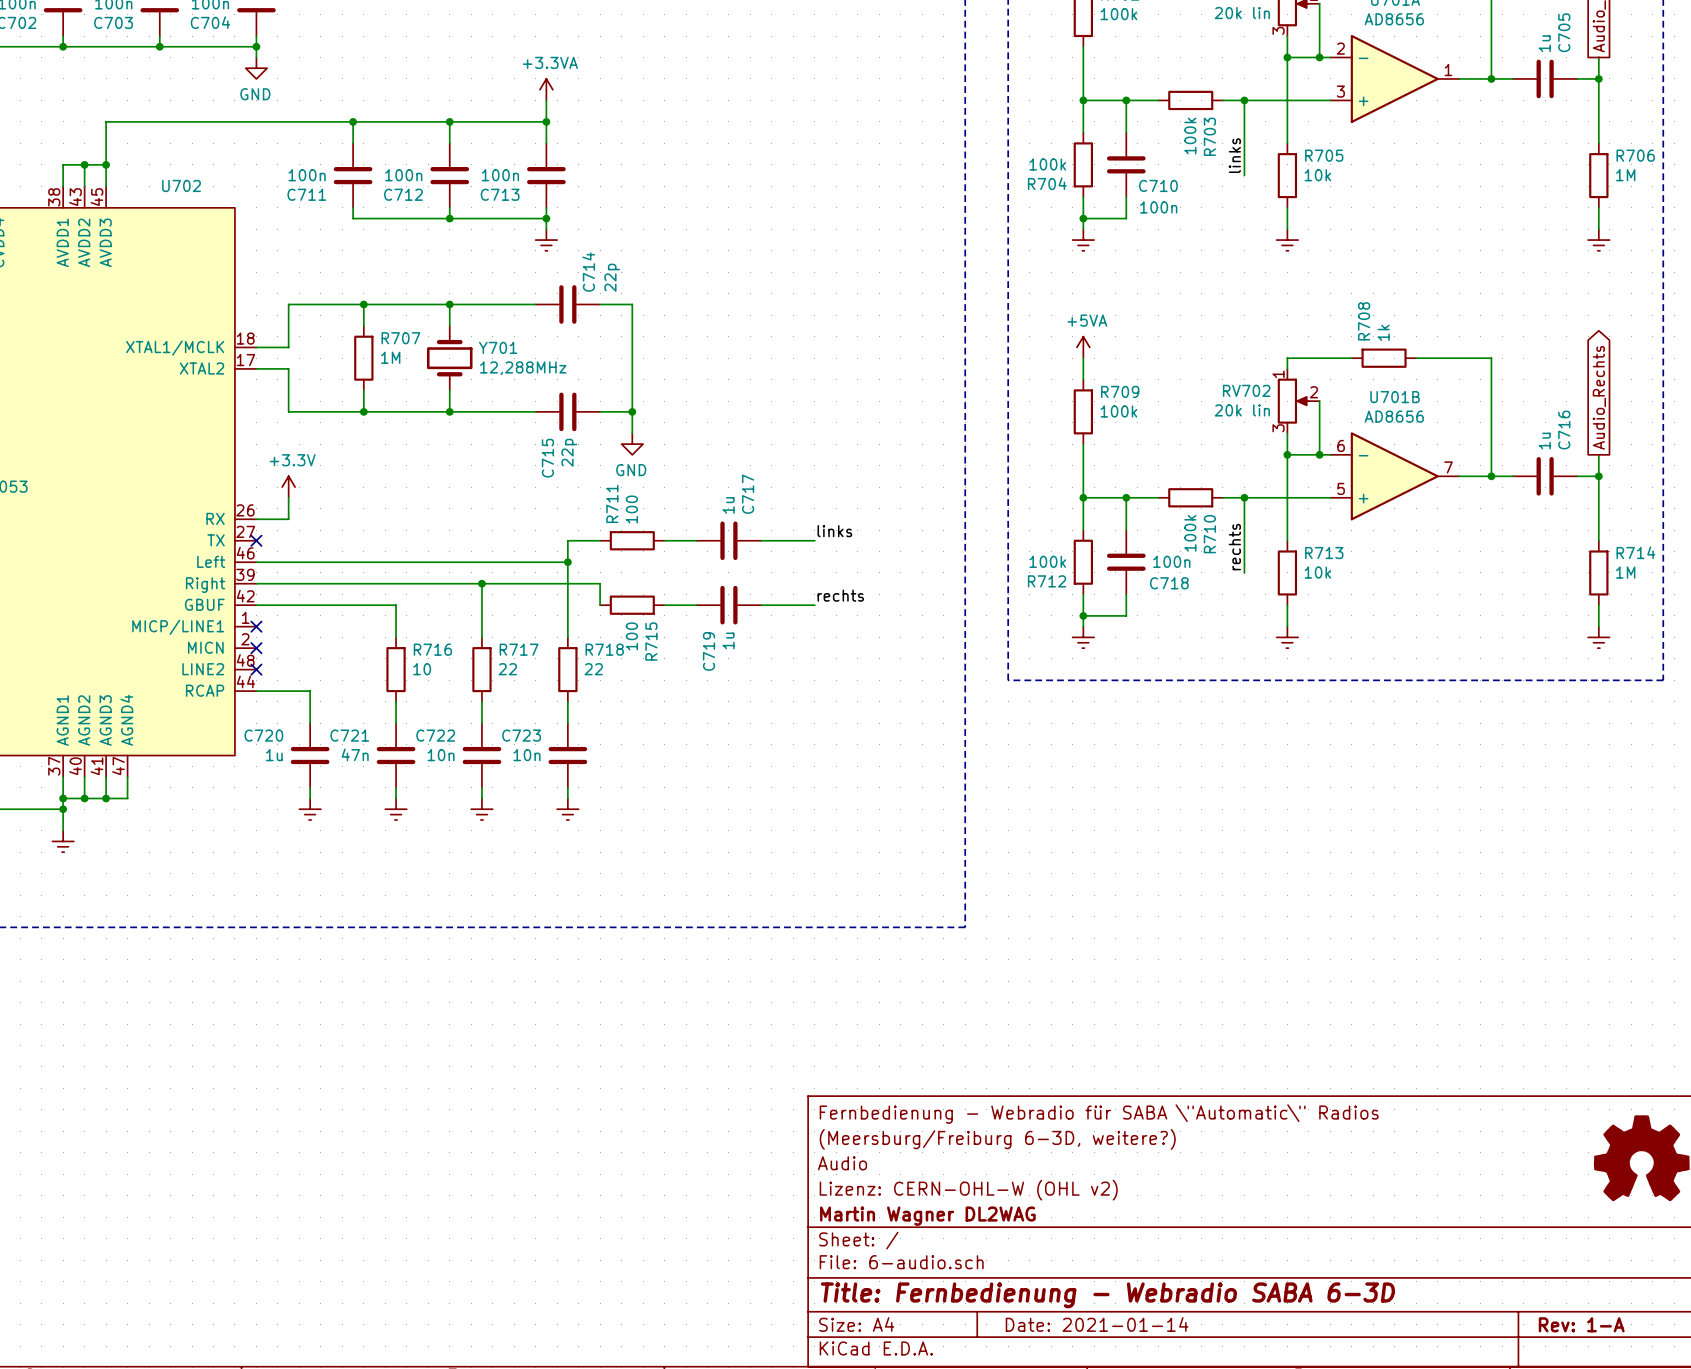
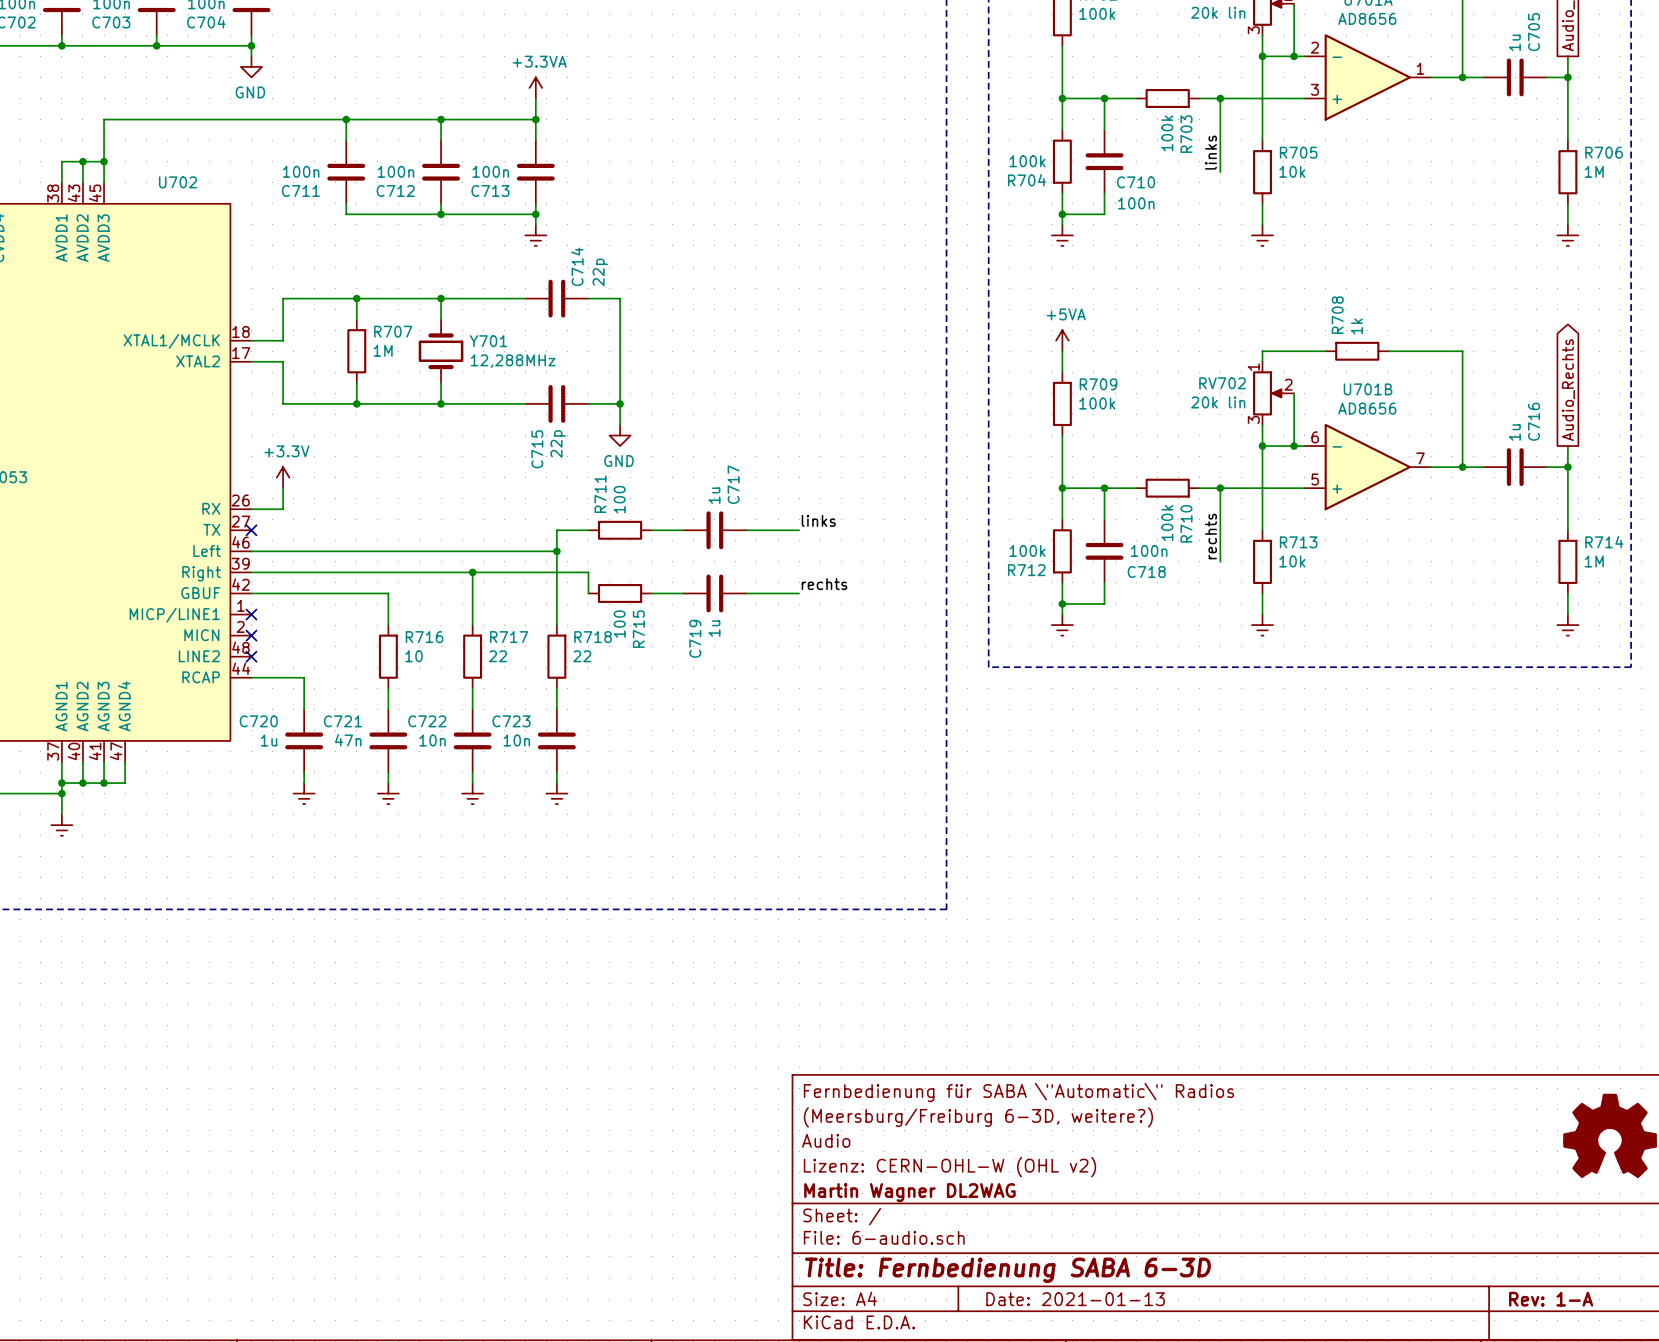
title block: Fernbedienung - Webradio für SABA \"Automatic\" Radios (1099, 1114) -> Fernbedienung für SABA \"Automatic\" Radios (1019, 1092)
title block: Title: Fernbedienung - Webradio SABA 6-3D (1107, 1295) -> Title: Fernbedienung SABA 6-3D (1007, 1270)
title block: Date: 2021-01-14 (1097, 1324) -> Date: 2021-01-13 (1075, 1299)

